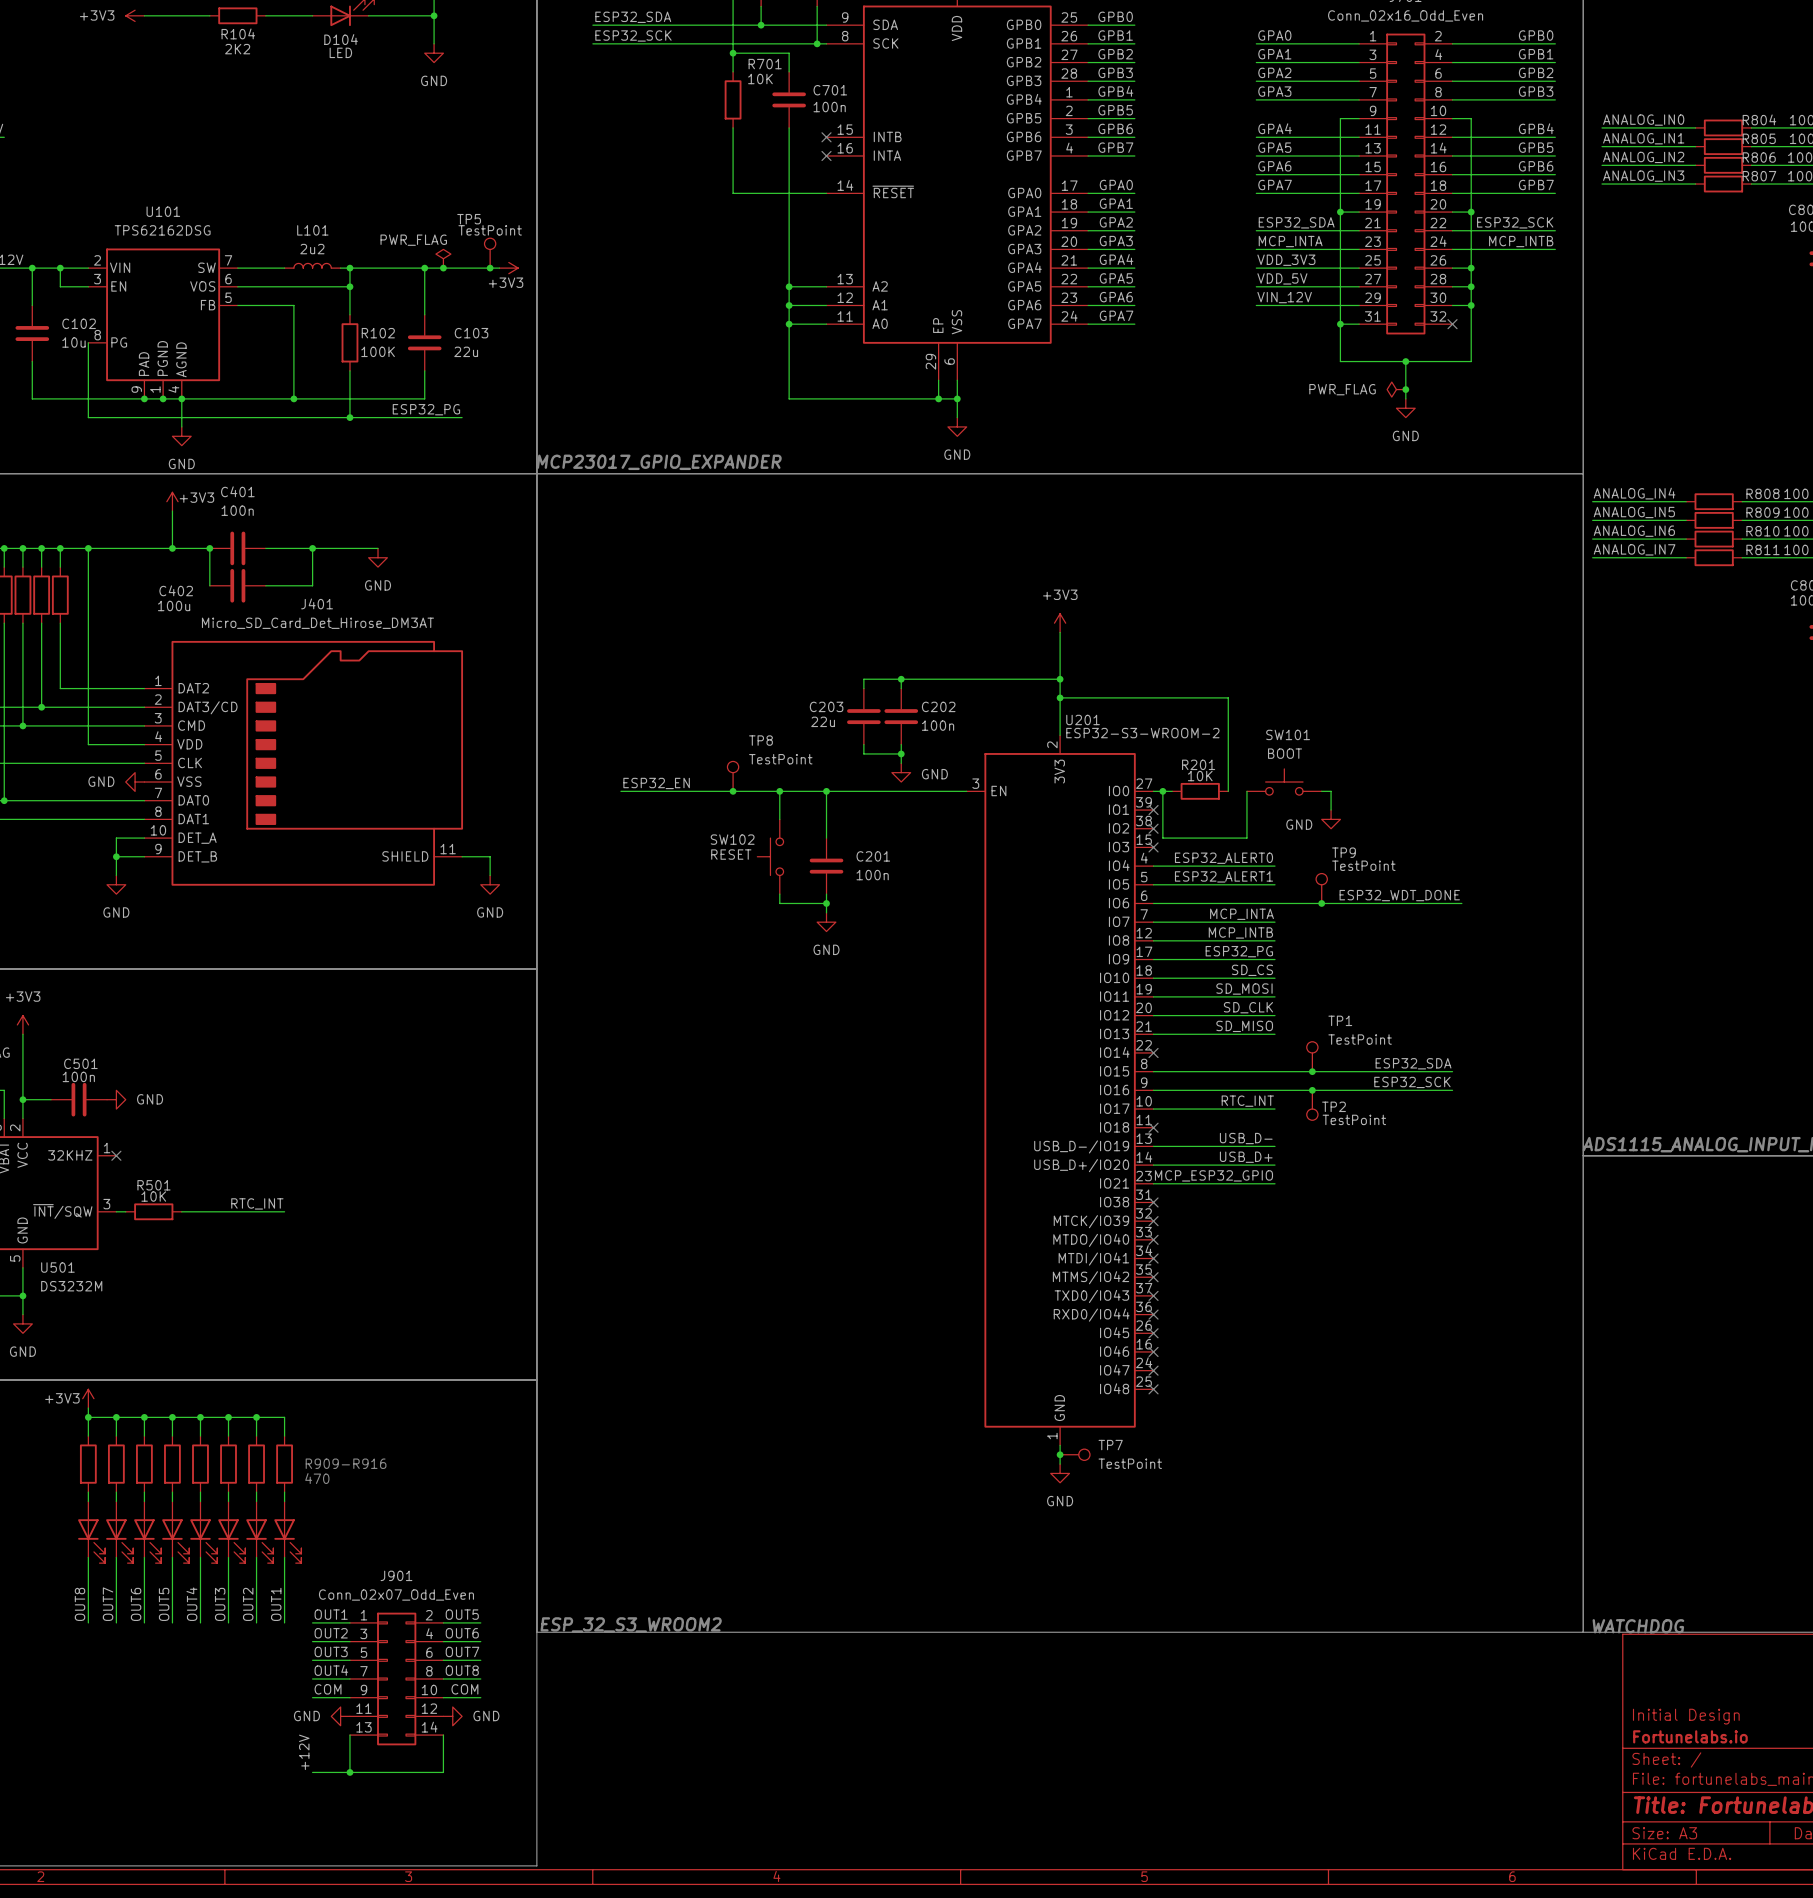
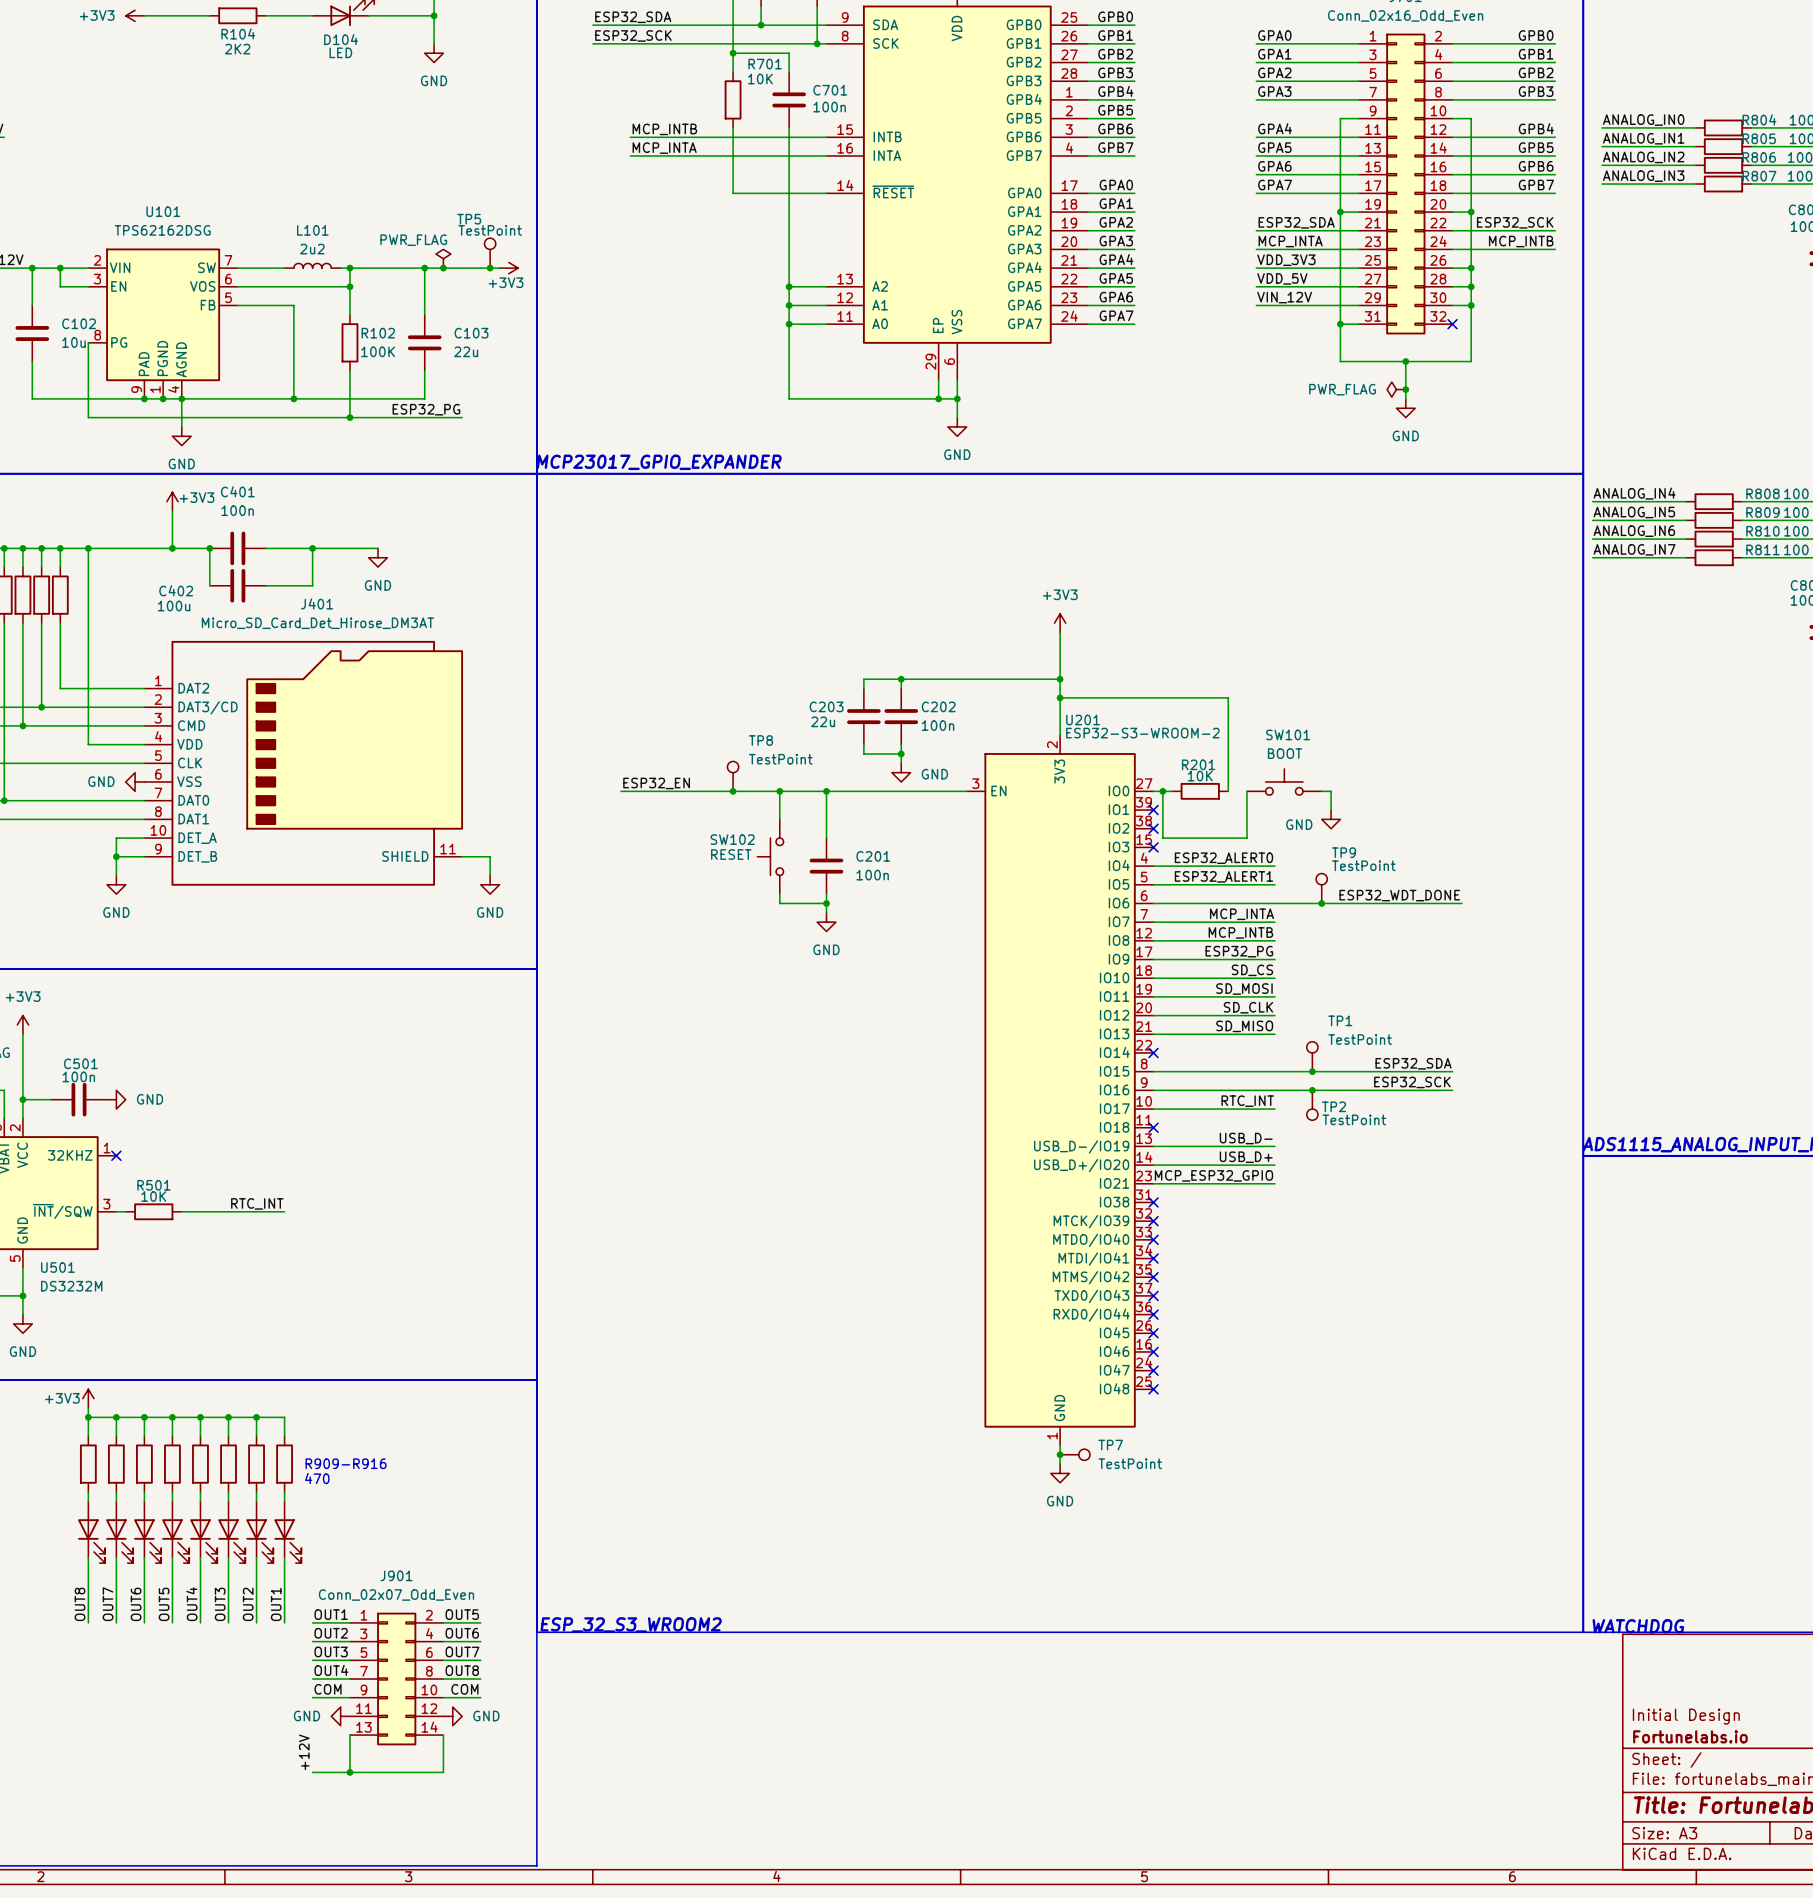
label: none -> MCP_INTB (664, 129)
wire: none -> (630, 137) (826, 137)
no-connect mark: (826, 137) -> none
label: none -> MCP_INTA (664, 148)
wire: none -> (630, 155) (826, 155)
no-connect mark: (826, 155) -> none

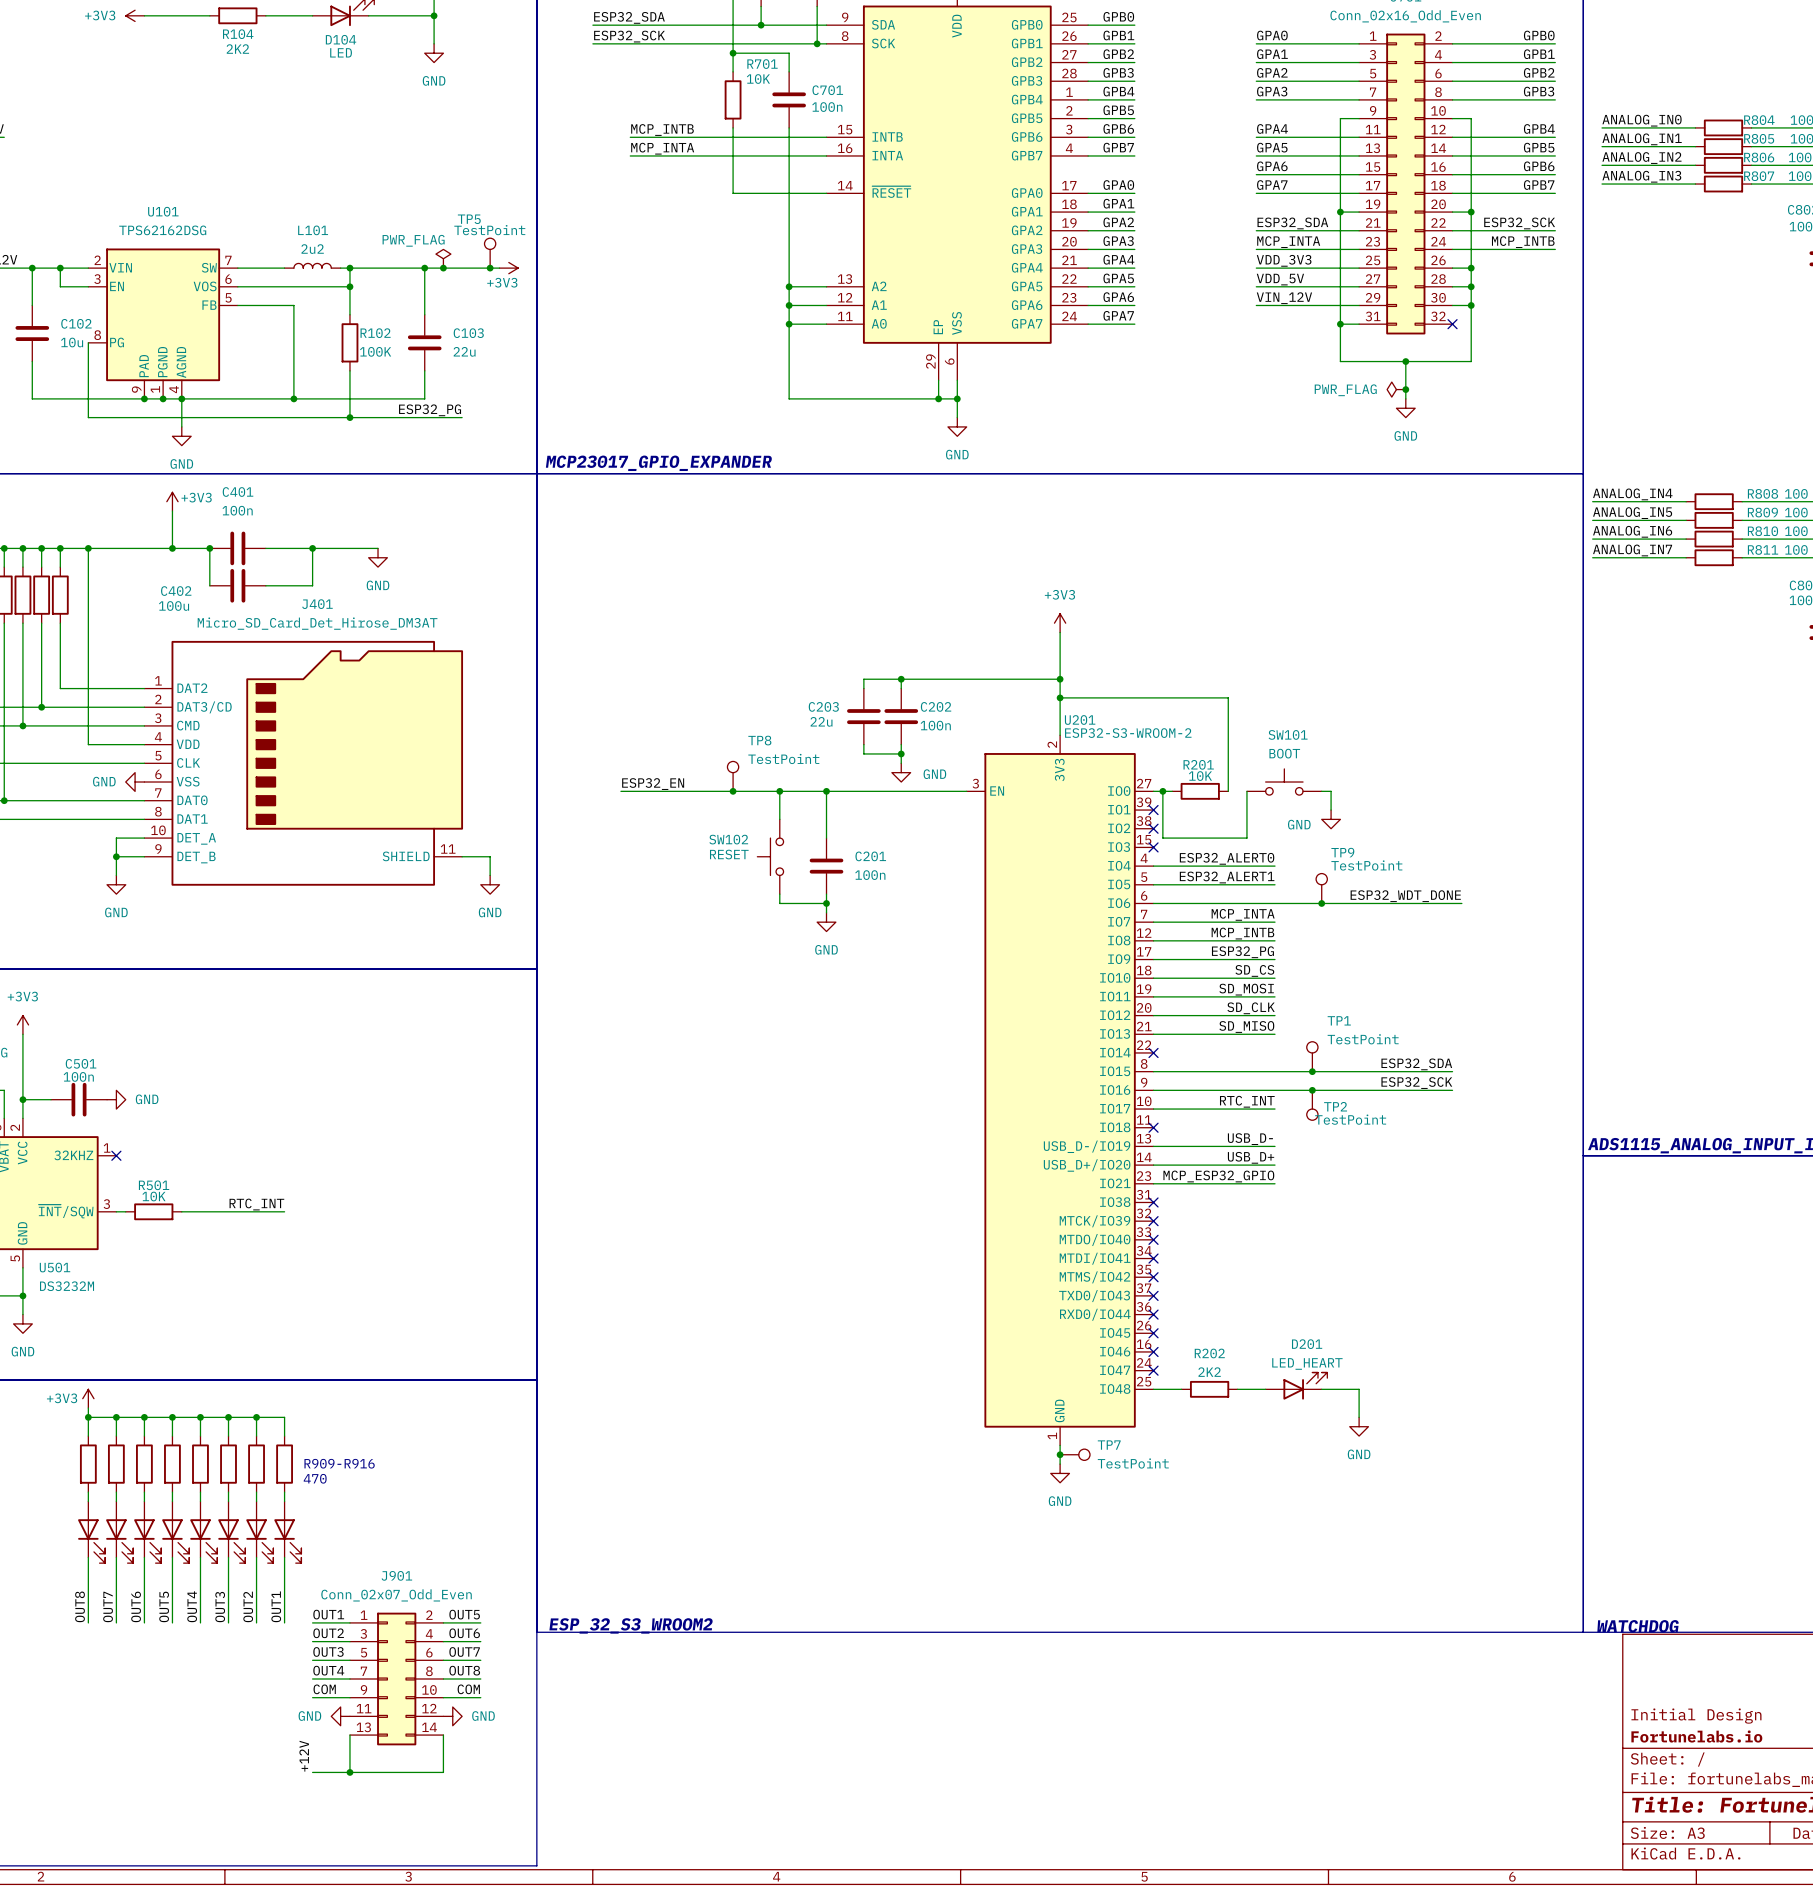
D201: none -> LED_HEART (1296, 1386)
wire: none -> (1153, 1389) (1181, 1389)
no-connect mark: (1153, 1389) -> none
R202: none -> 2K2 (1209, 1389)
wire: none -> (1237, 1389) (1265, 1389)
wire: none -> (1321, 1389) (1359, 1389) (1359, 1417)
power symbol: none -> GND (1359, 1426)

